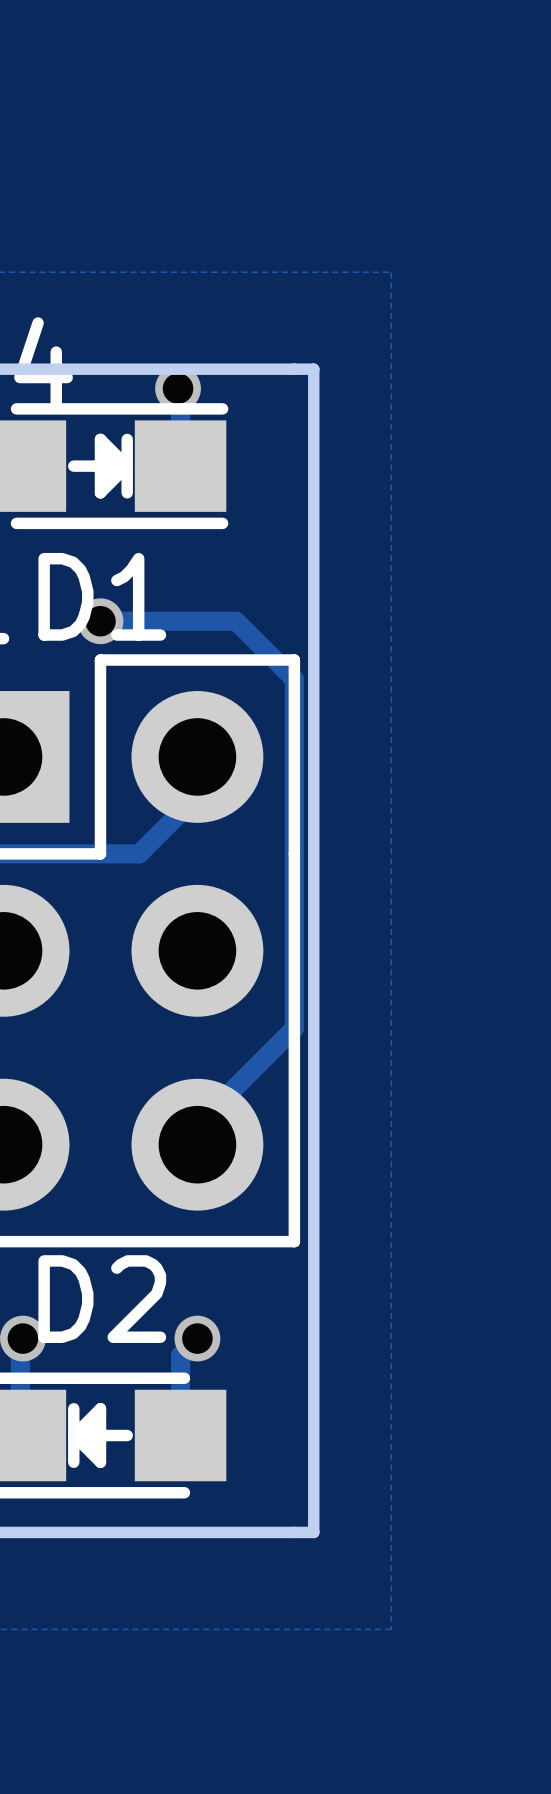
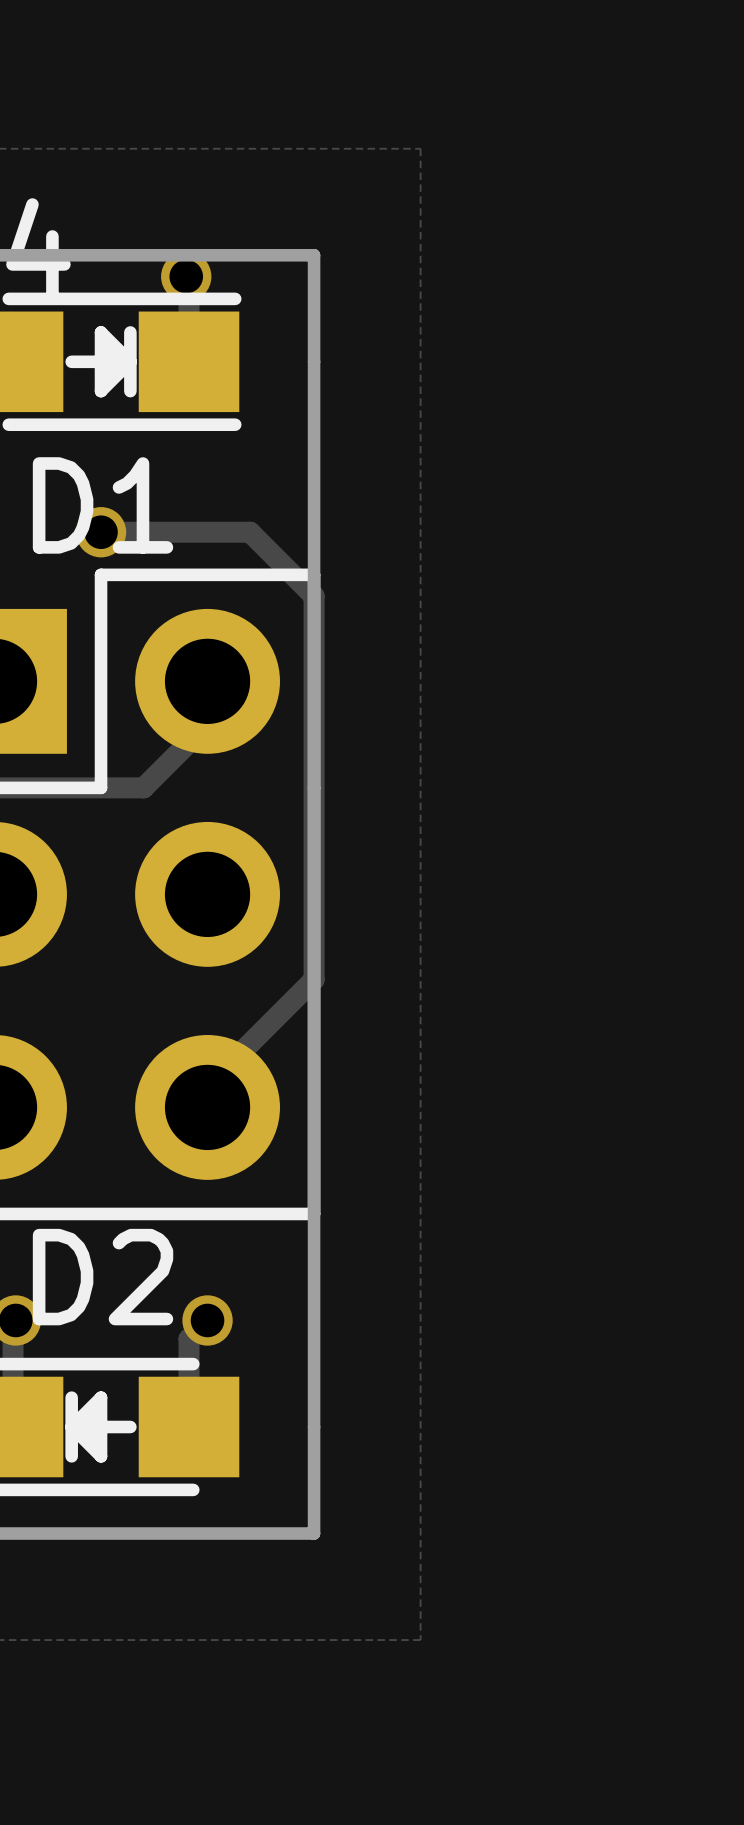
board edge: (294, 369) (313, 369) (313, 1532) (294, 1532) -> (314, 255) (314, 1533)

